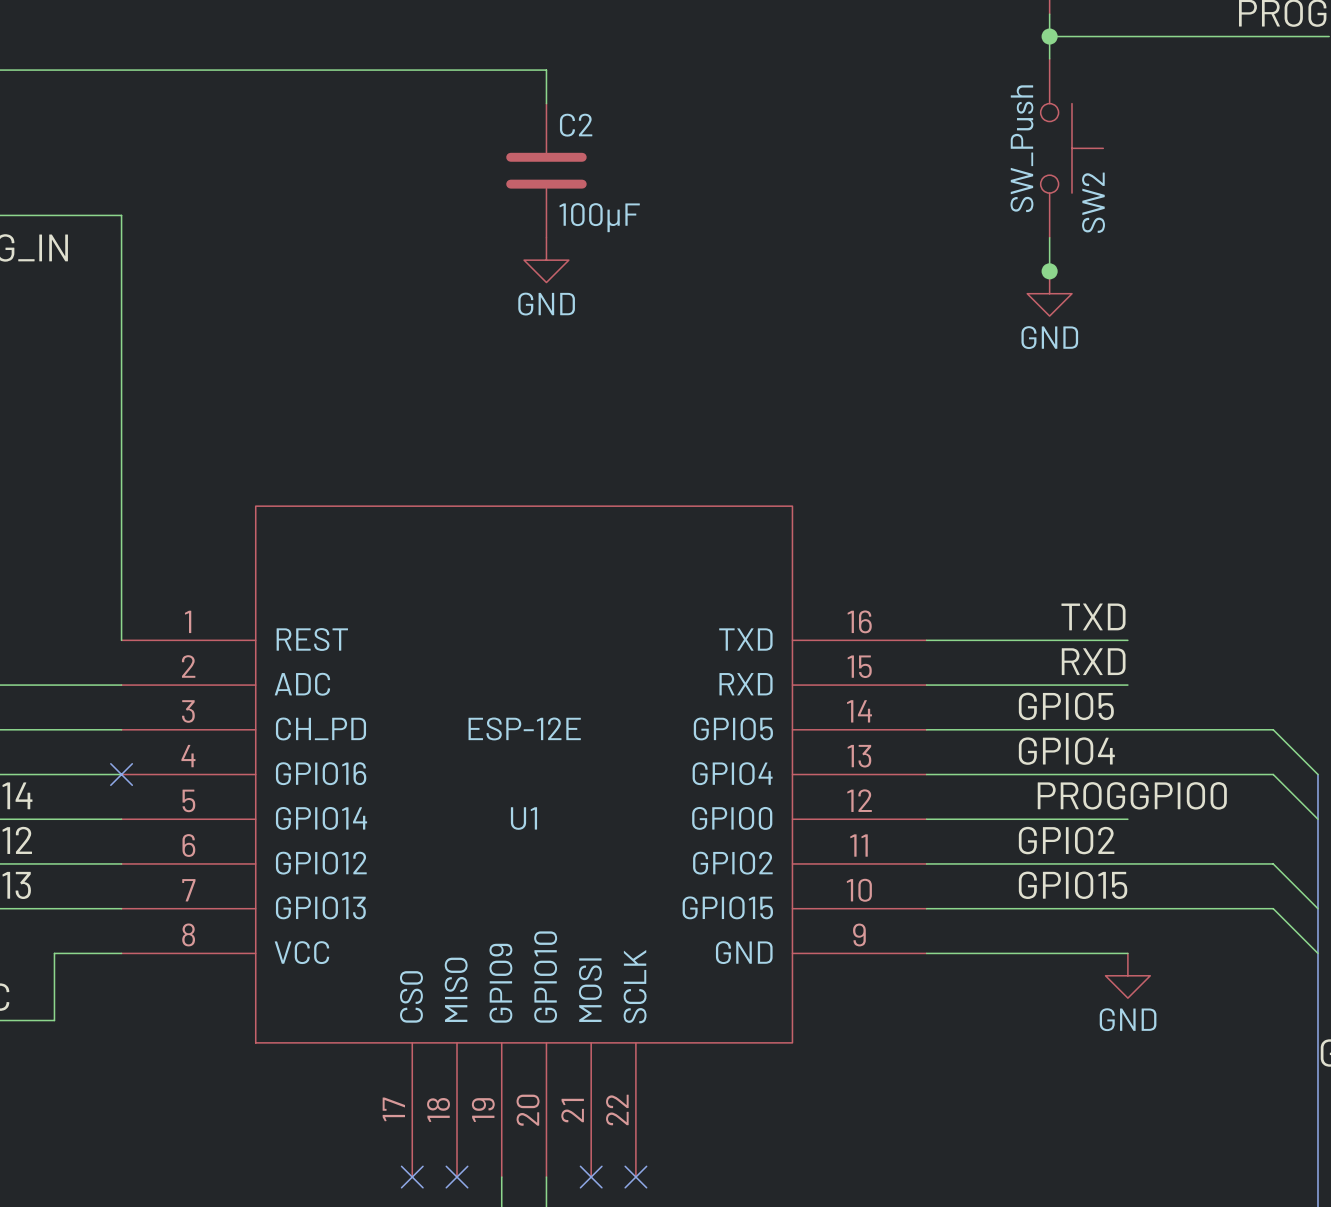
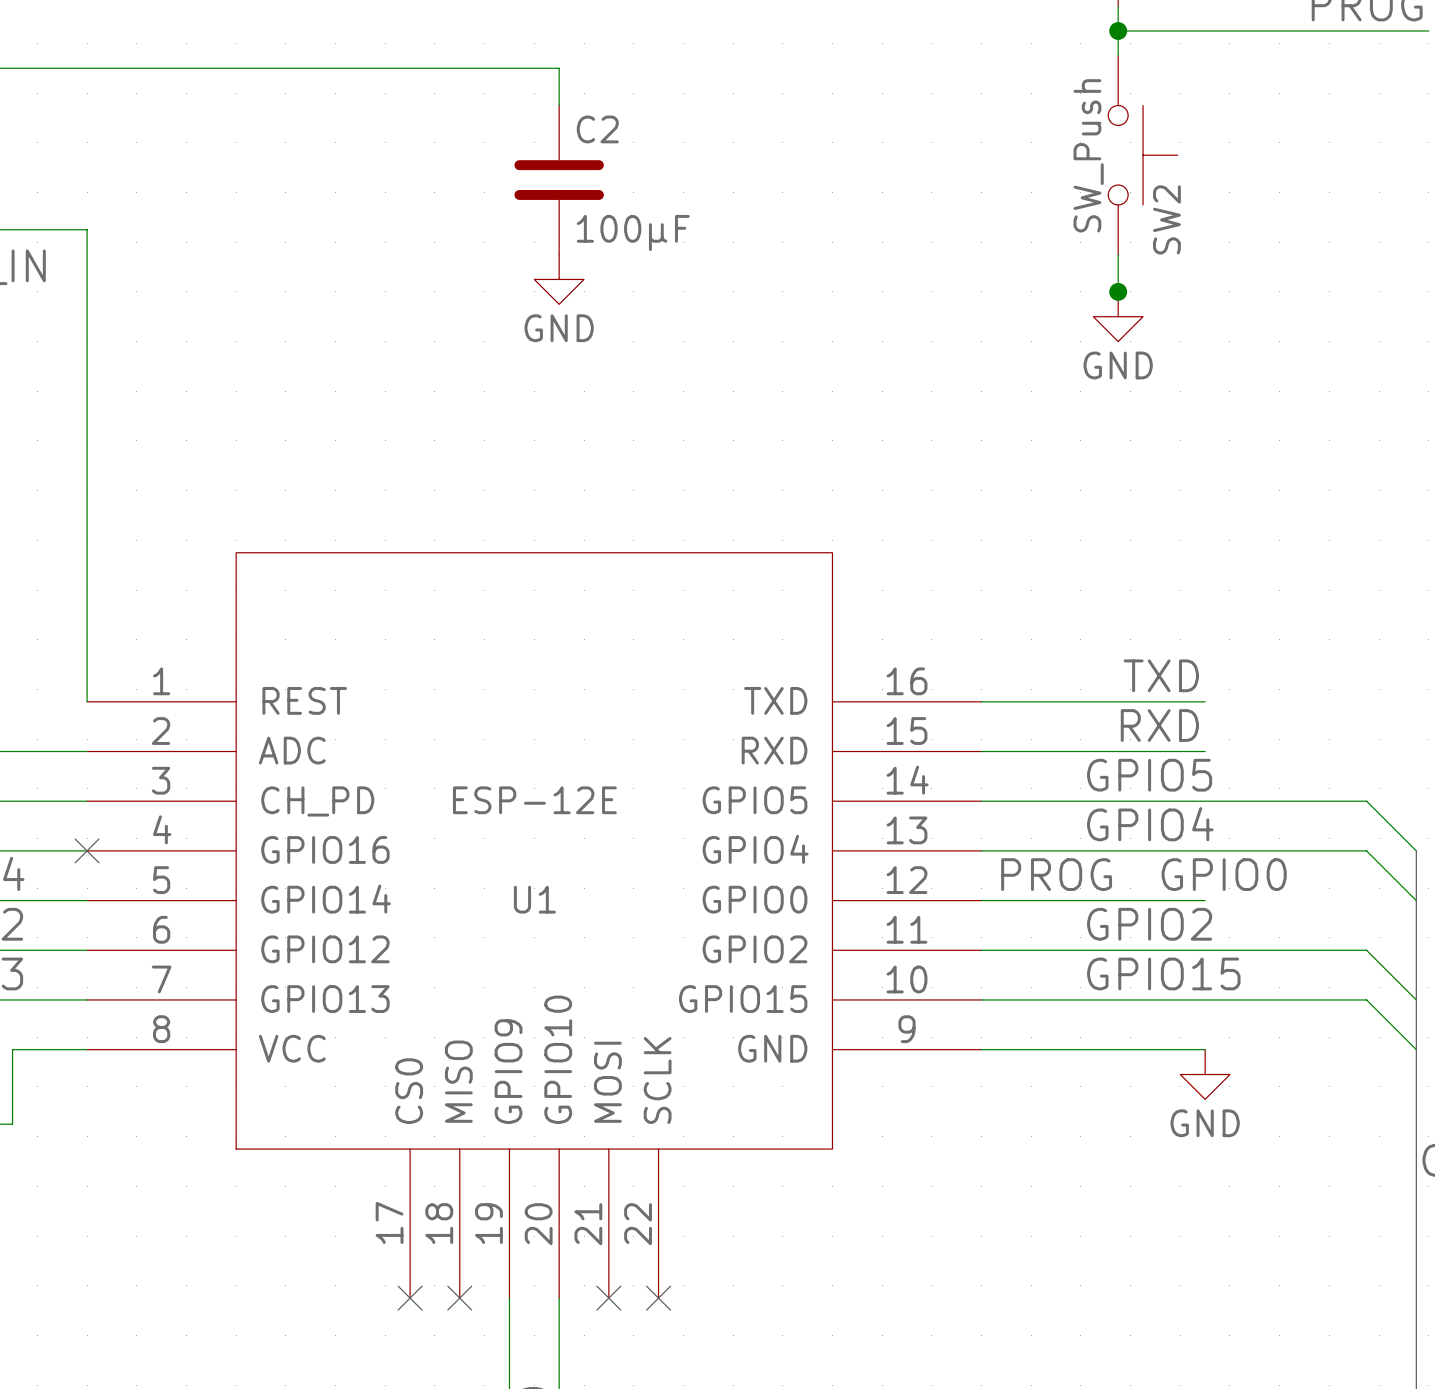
label position: PROG (1081, 795) -> PROG (1056, 874)
label position: GPIO0 (1178, 795) -> GPIO0 (1224, 874)

